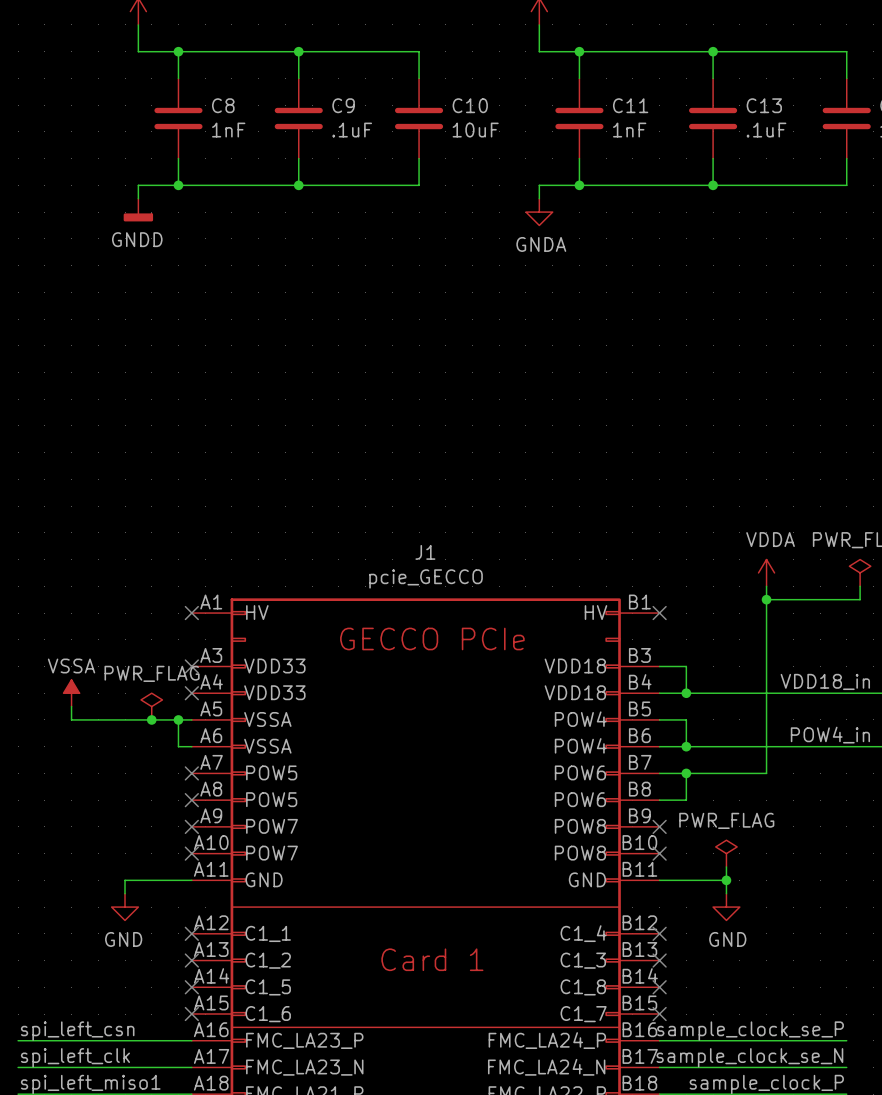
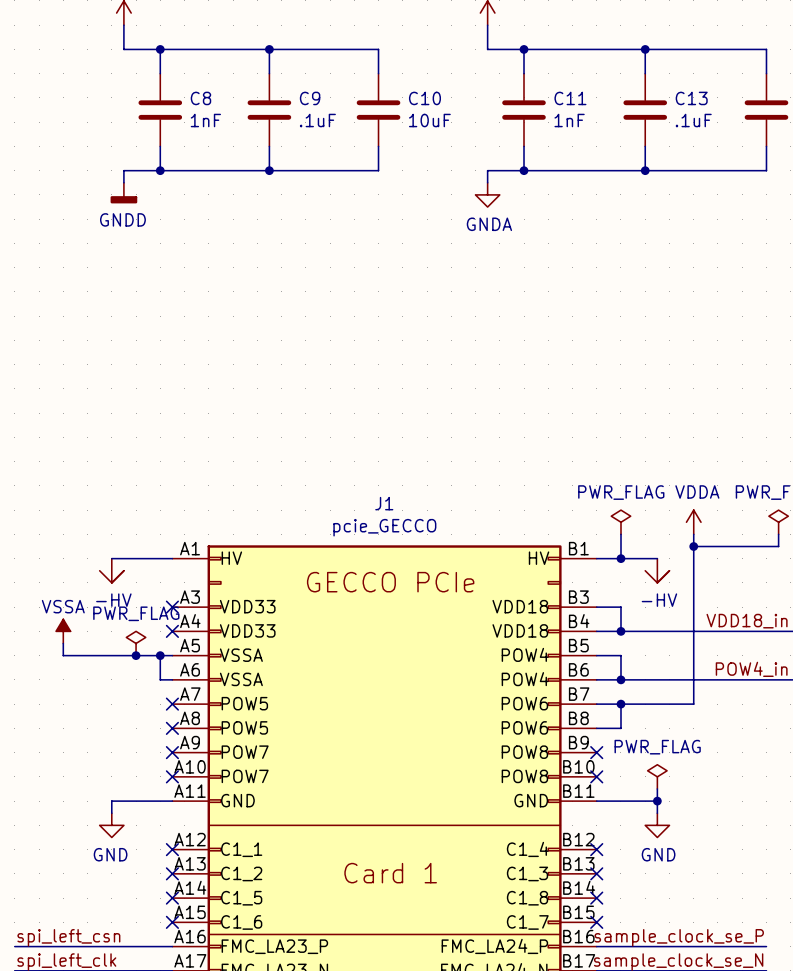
power symbol: none -> PWR_FLAG (620, 522)
wire: none -> (620, 534) (620, 558)
wire: none -> (111, 558) (172, 558)
no-connect mark: (191, 613) -> none
wire: none -> (596, 558) (657, 558)
no-connect mark: (659, 613) -> none
junction: none -> (620, 558)
power symbol: none -> -HV (111, 570)
power symbol: none -> -HV (657, 570)

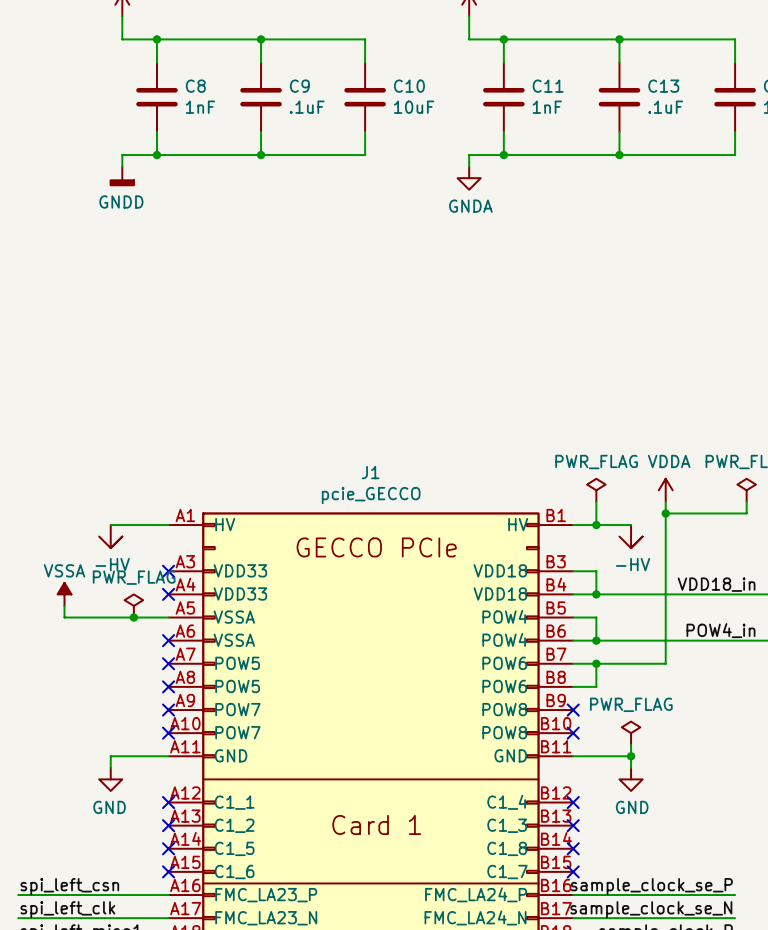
wire: (160, 655) (160, 679) (172, 679) -> none
junction: (160, 655) -> none
no-connect mark: none -> (168, 640)

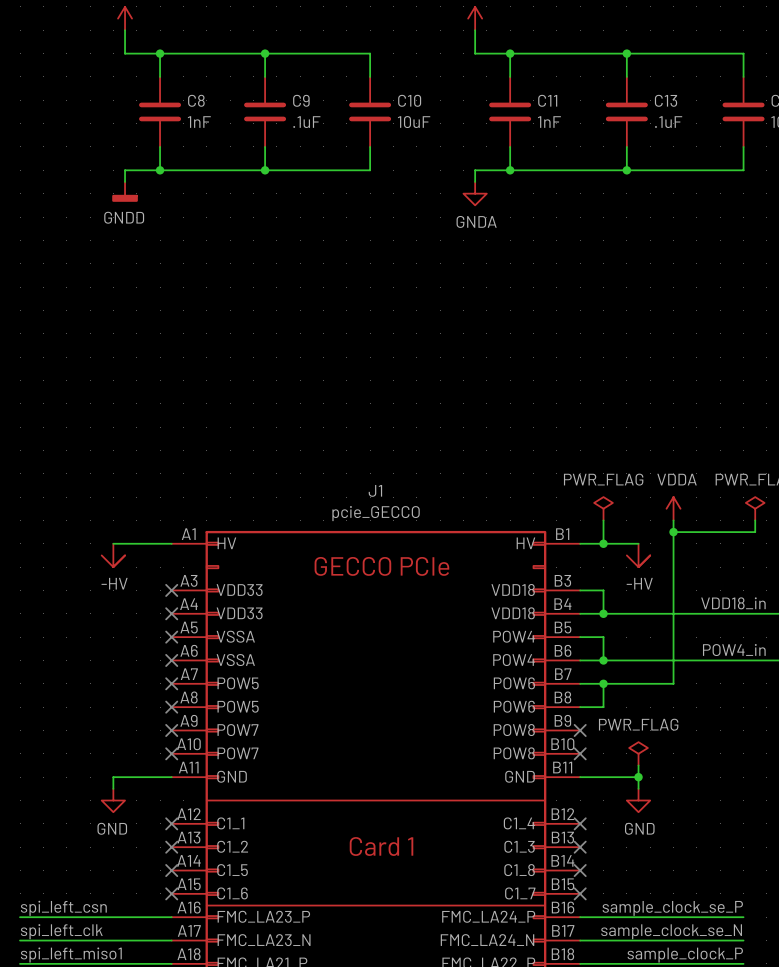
power symbol: VSSA (64, 594) -> none
wire: (64, 605) (64, 617) (168, 617) -> none
power symbol: PWR_FLAG (133, 605) -> none
junction: (133, 617) -> none
no-connect mark: none -> (171, 637)

